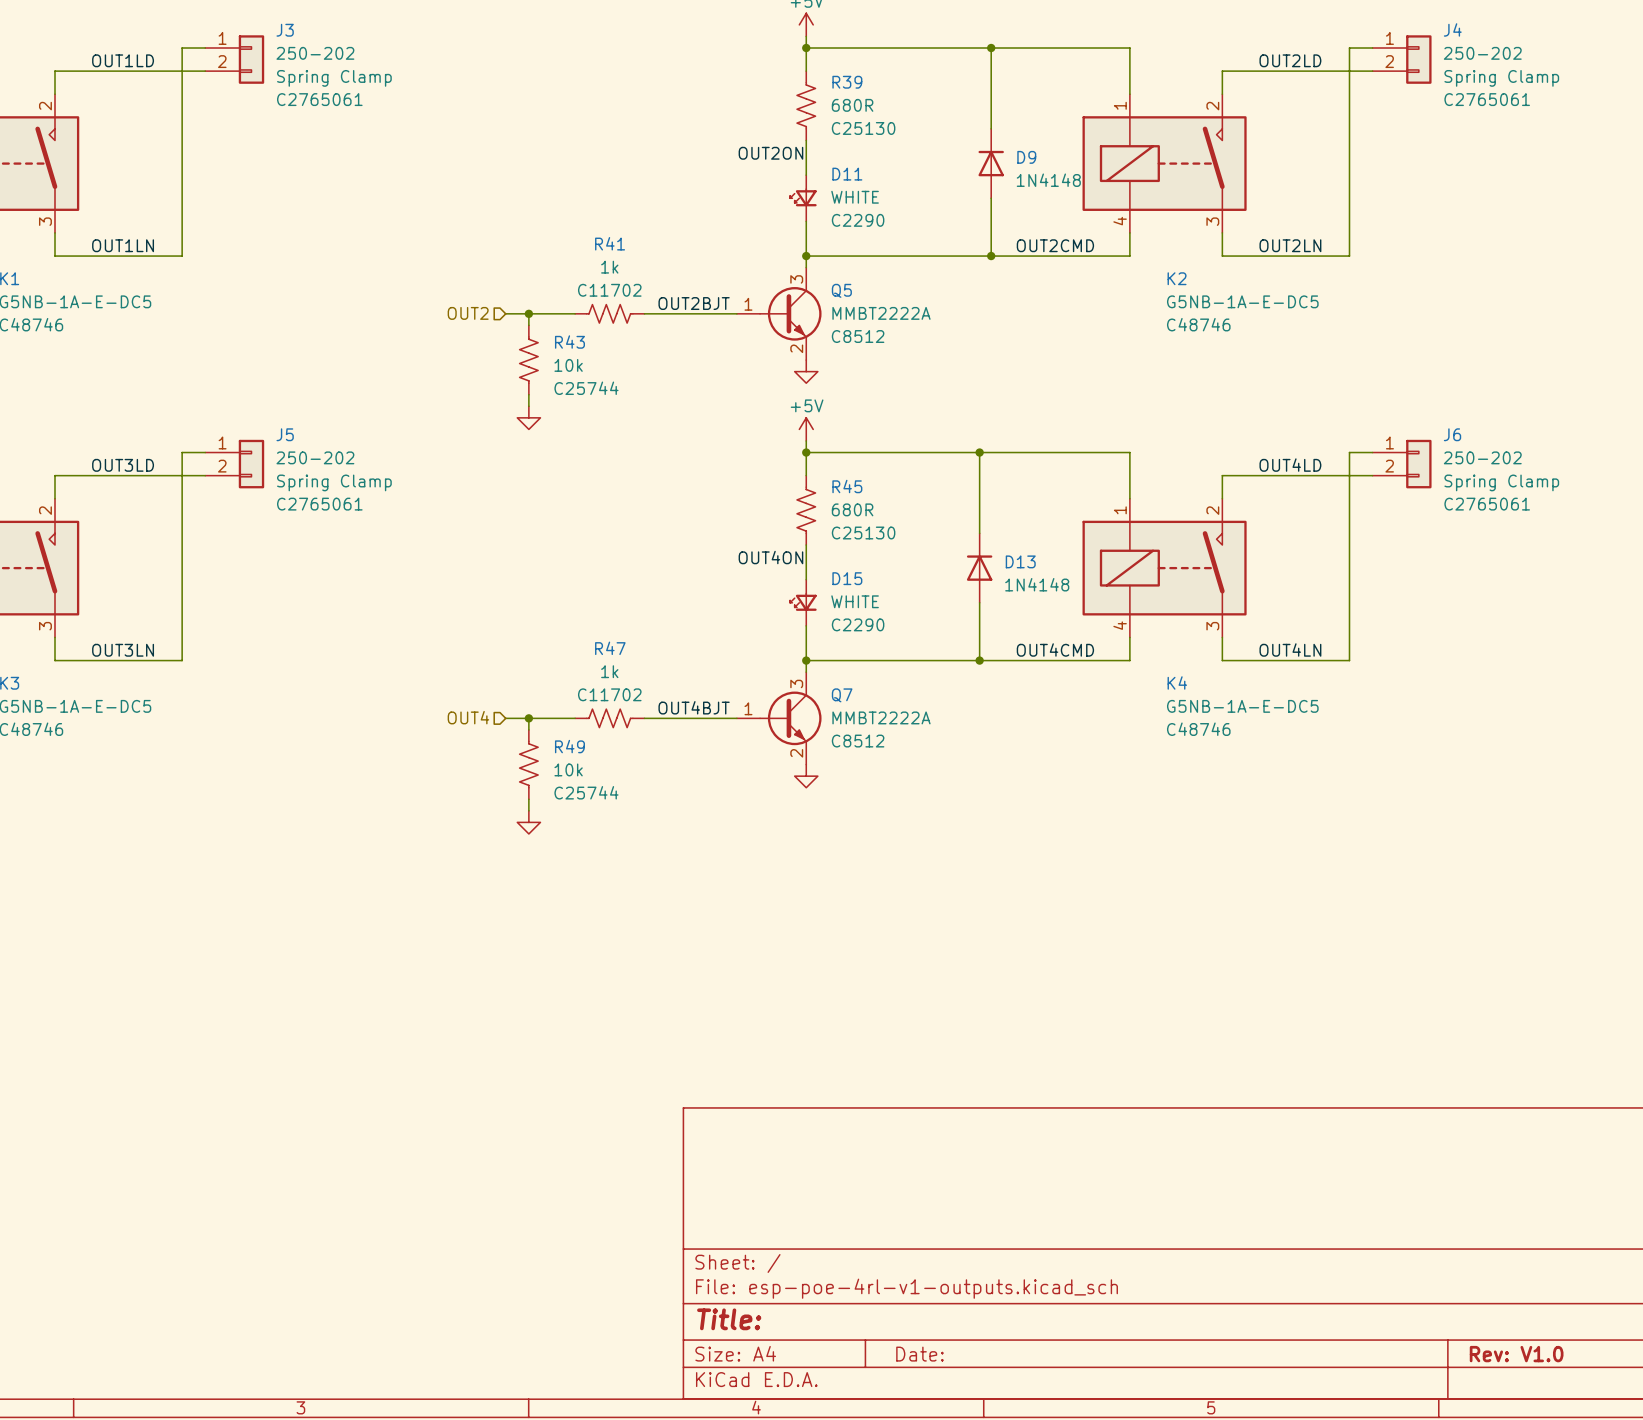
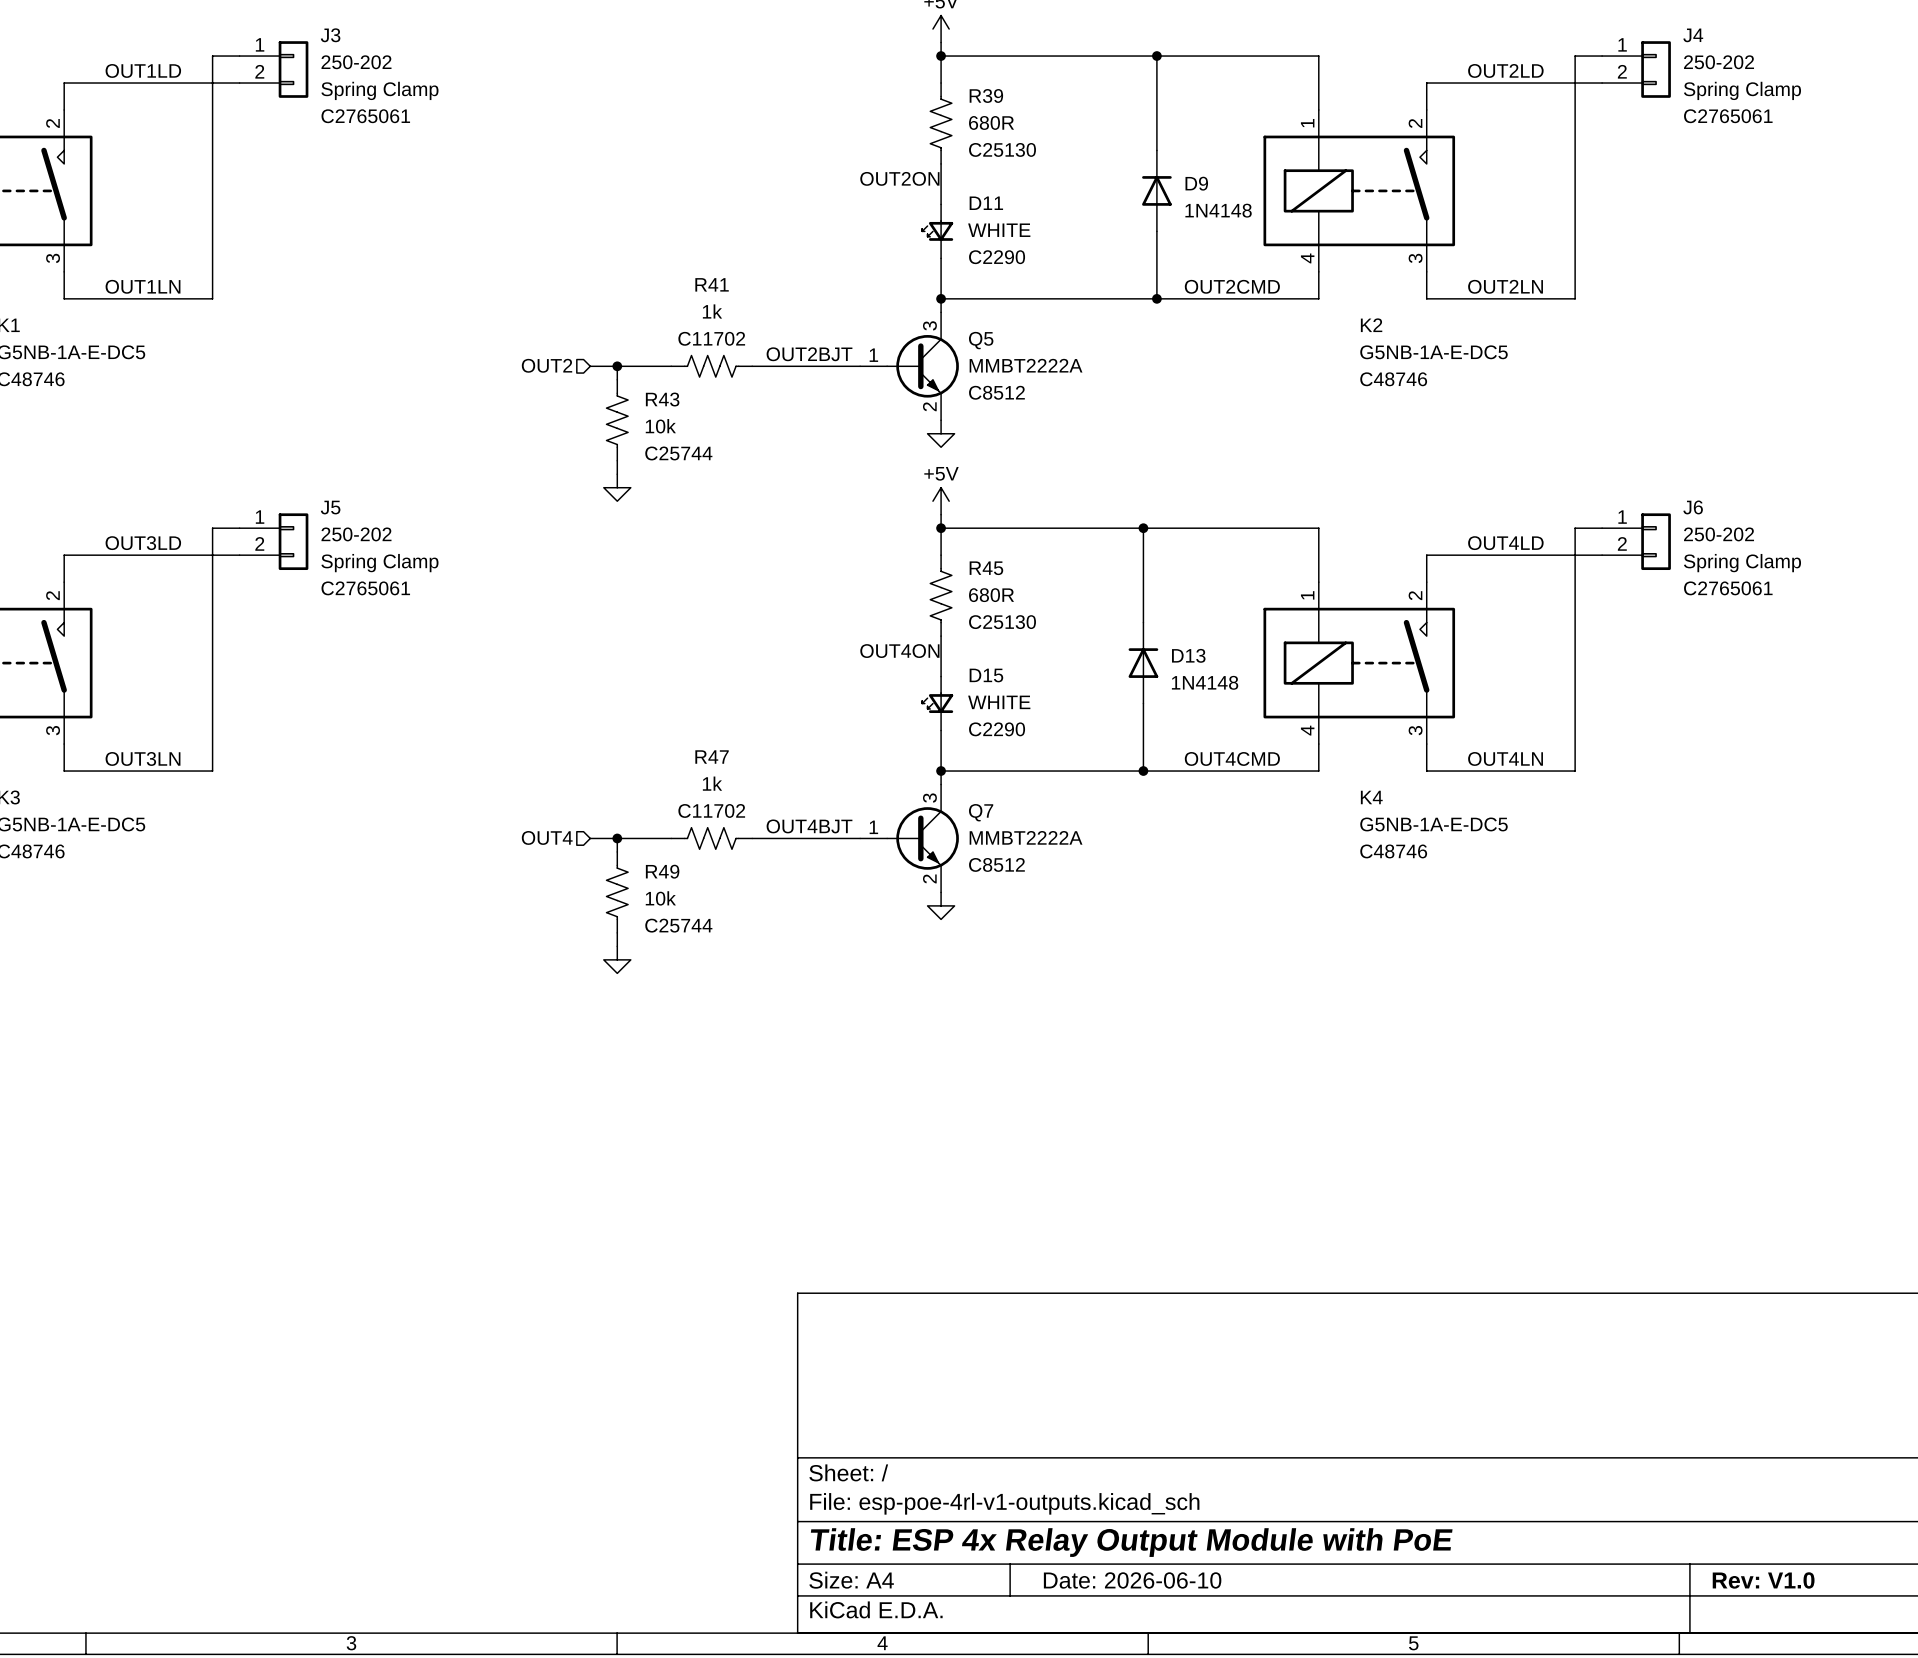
title block: Title: (729, 1319) -> Title: ESP 4x Relay Output Module with PoE (1131, 1542)
title block: Date: (919, 1354) -> Date: 2026-06-10 (1132, 1580)

